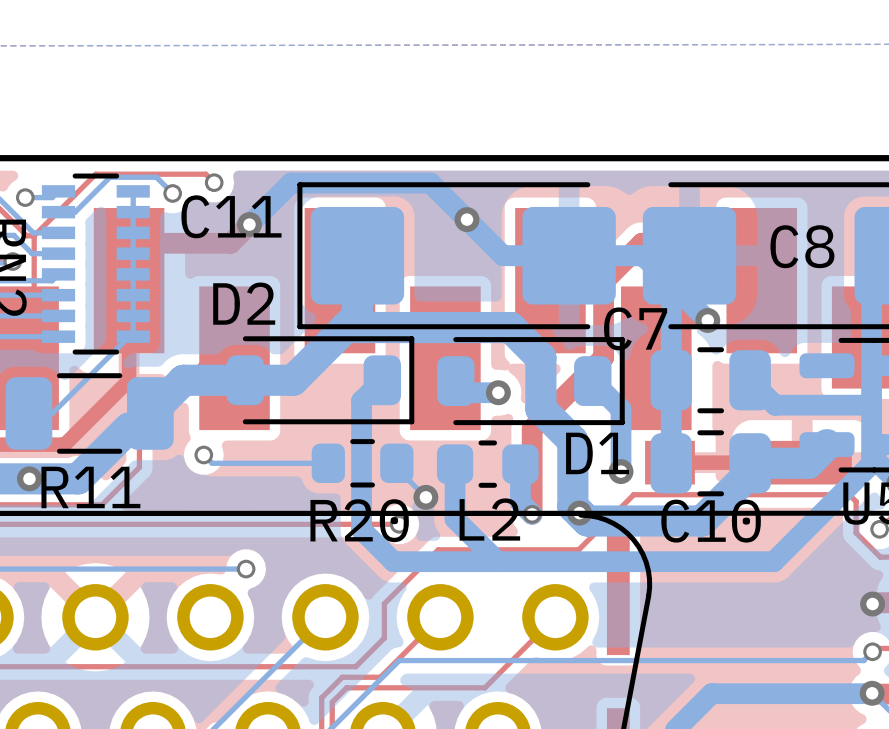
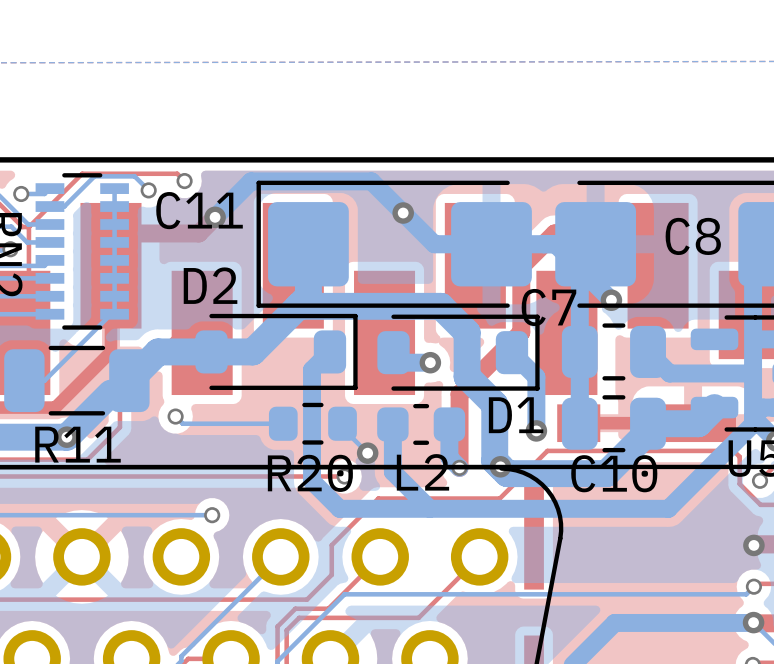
via position: (29, 478) -> (66, 437)

